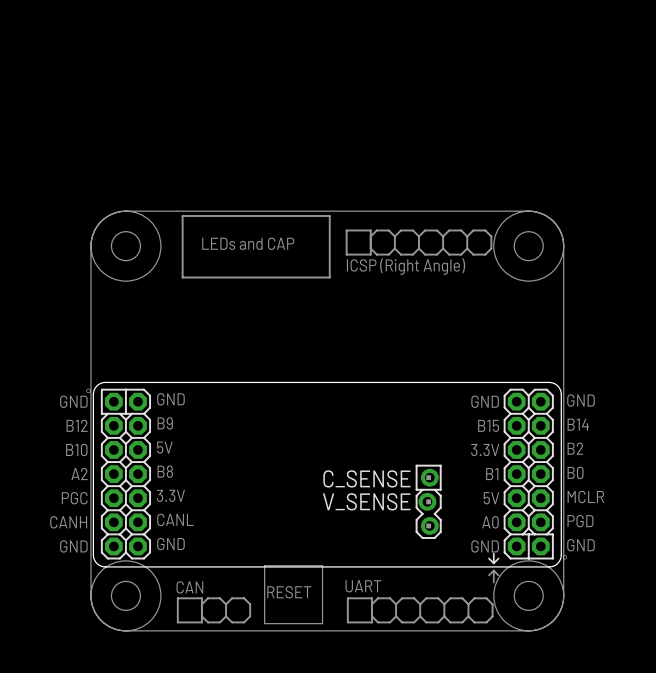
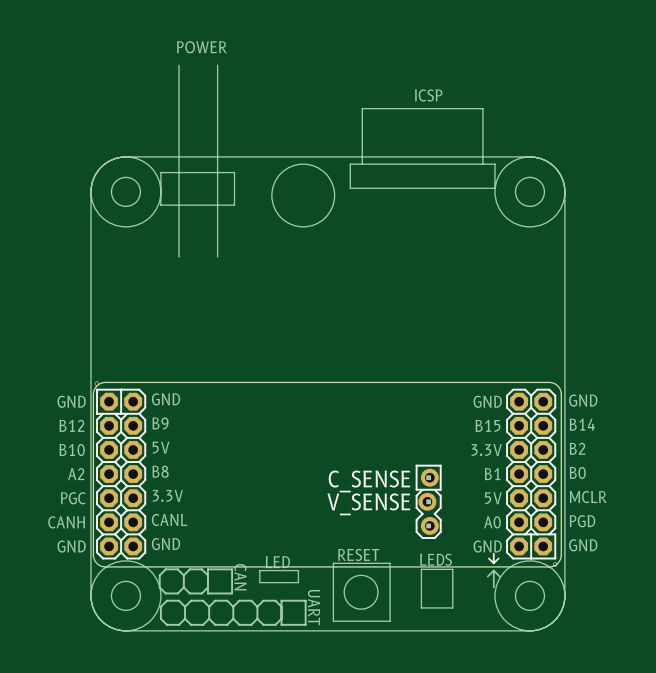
part: none -> (327, 347)
part: (326, 421) -> none

